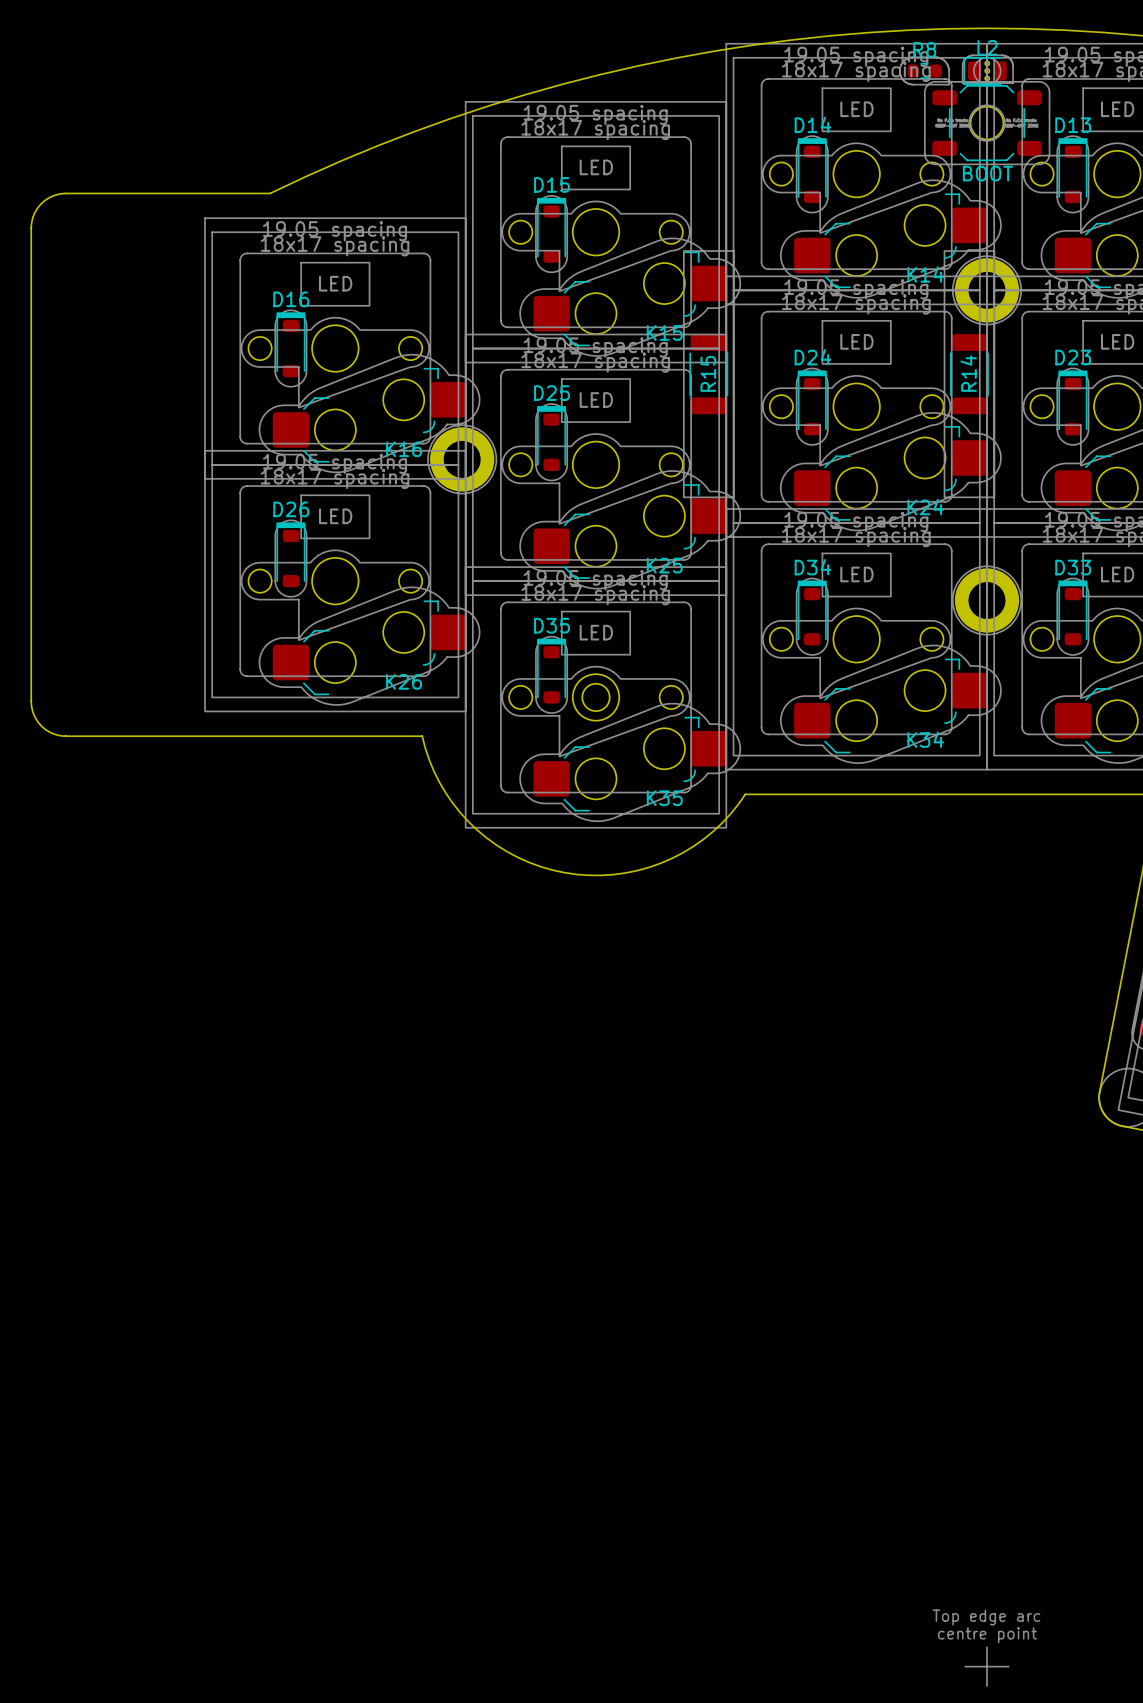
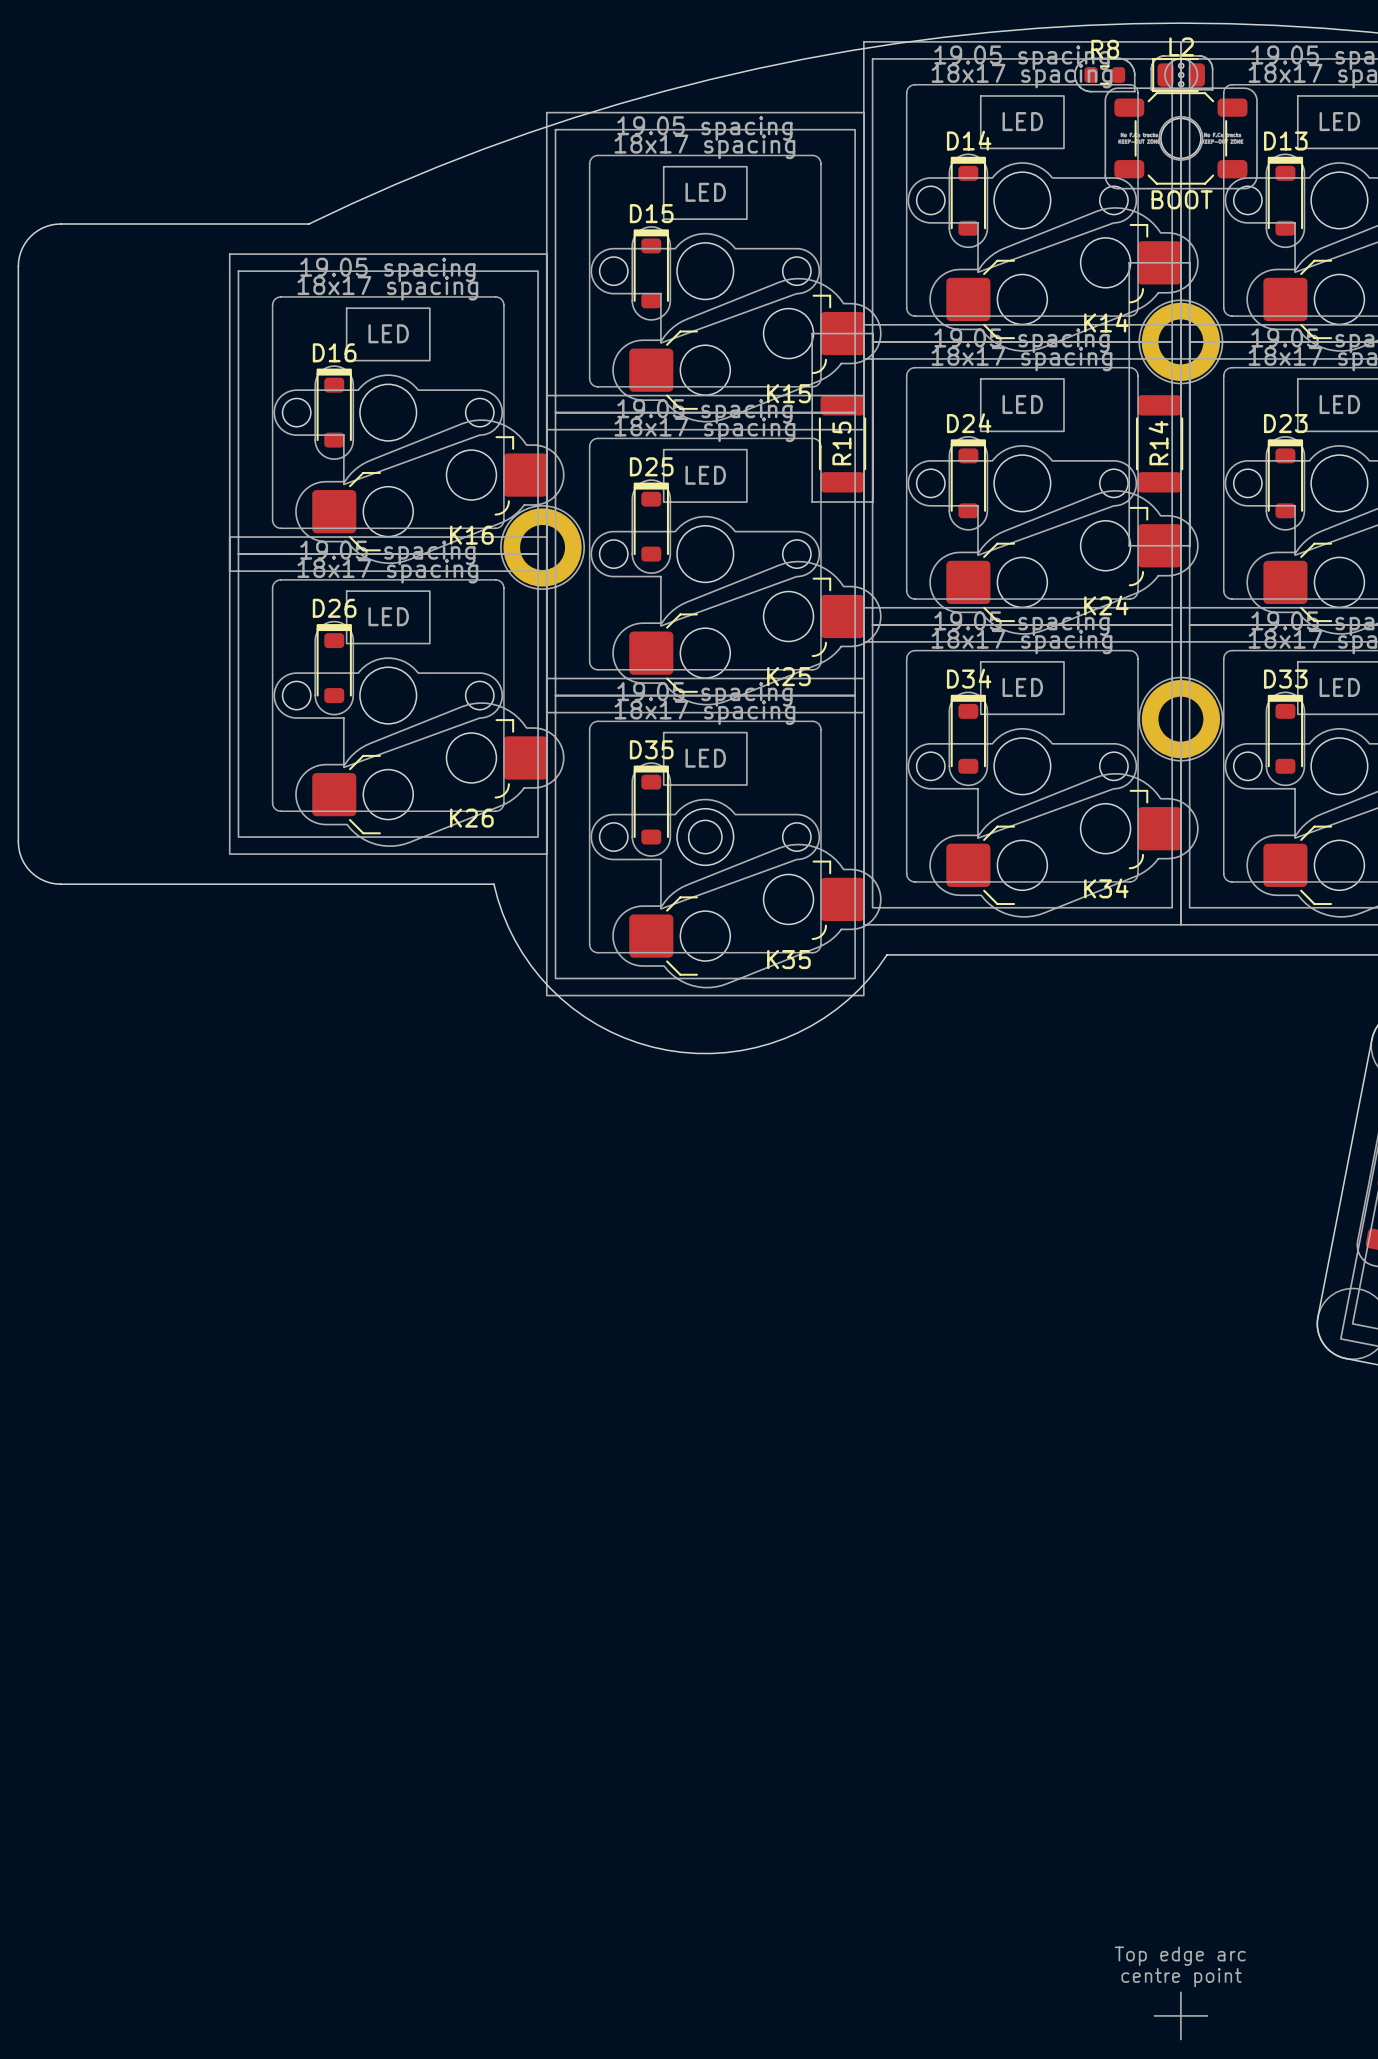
line: none -> (1129, 262) (1189, 262) (1189, 545) (1129, 545) (1129, 262)
R15 footprint: [683, 250, 735, 499] -> [818, 395, 867, 493]
R14 footprint: [943, 250, 996, 499] -> [1135, 395, 1184, 493]
line: none -> (812, 333) (872, 333) (872, 501) (812, 501) (812, 333)

